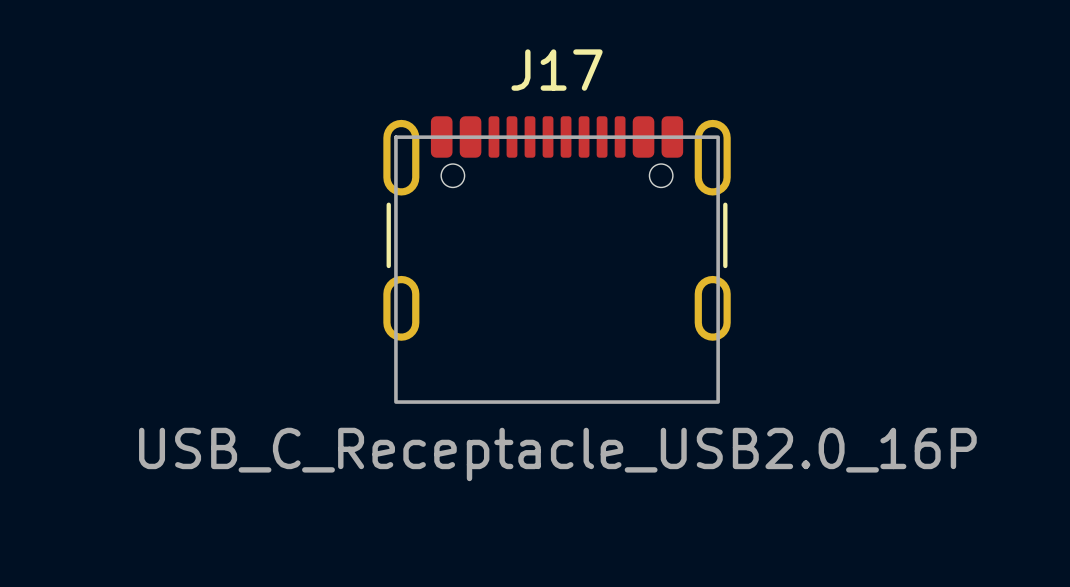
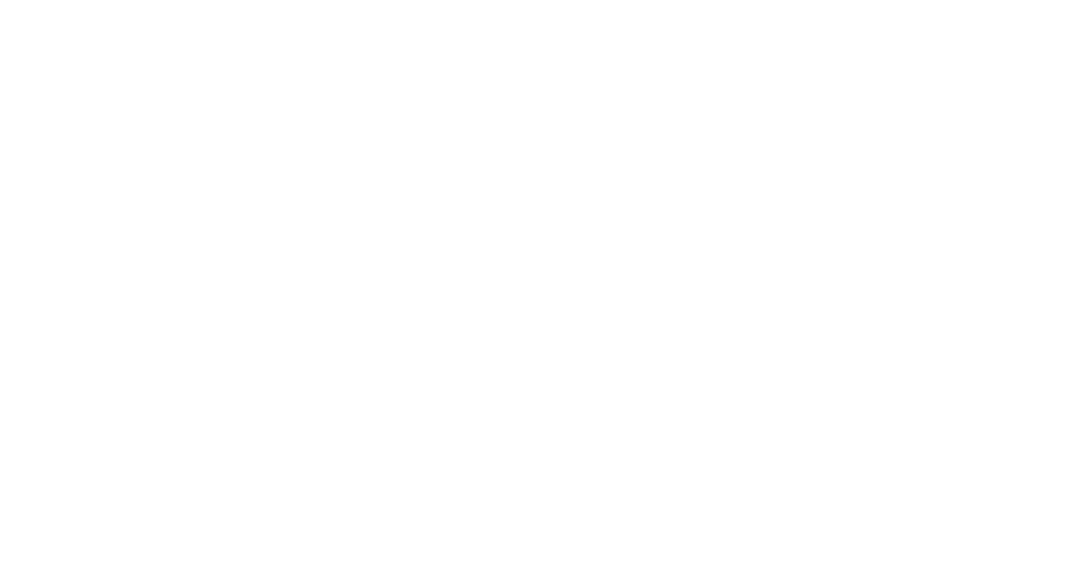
J17: USB_C_Receptacle_USB2.0_16P (557, 260) -> none

